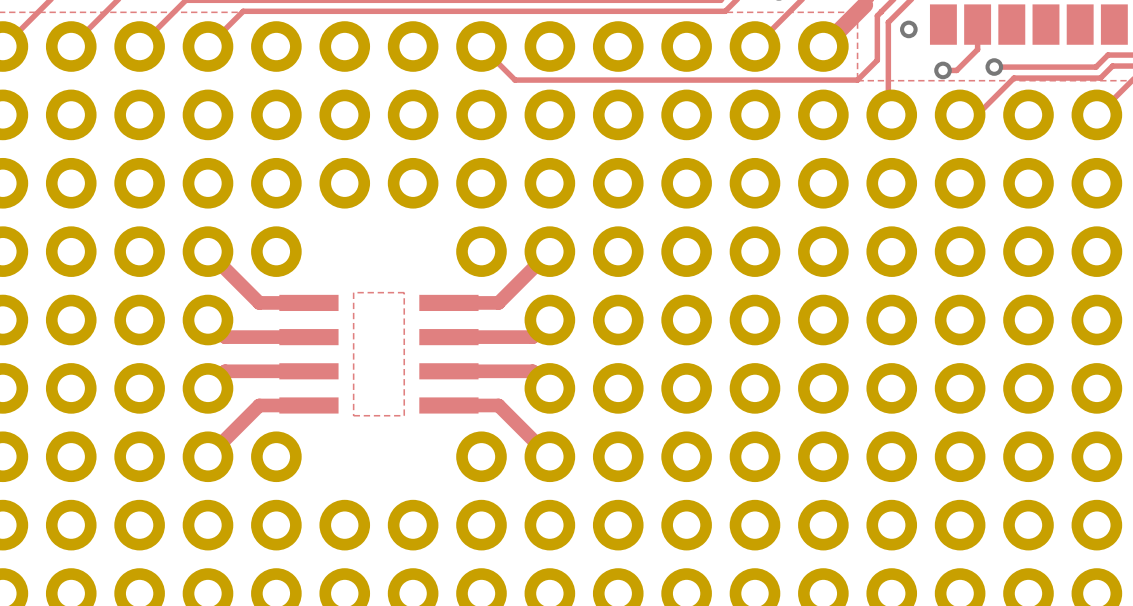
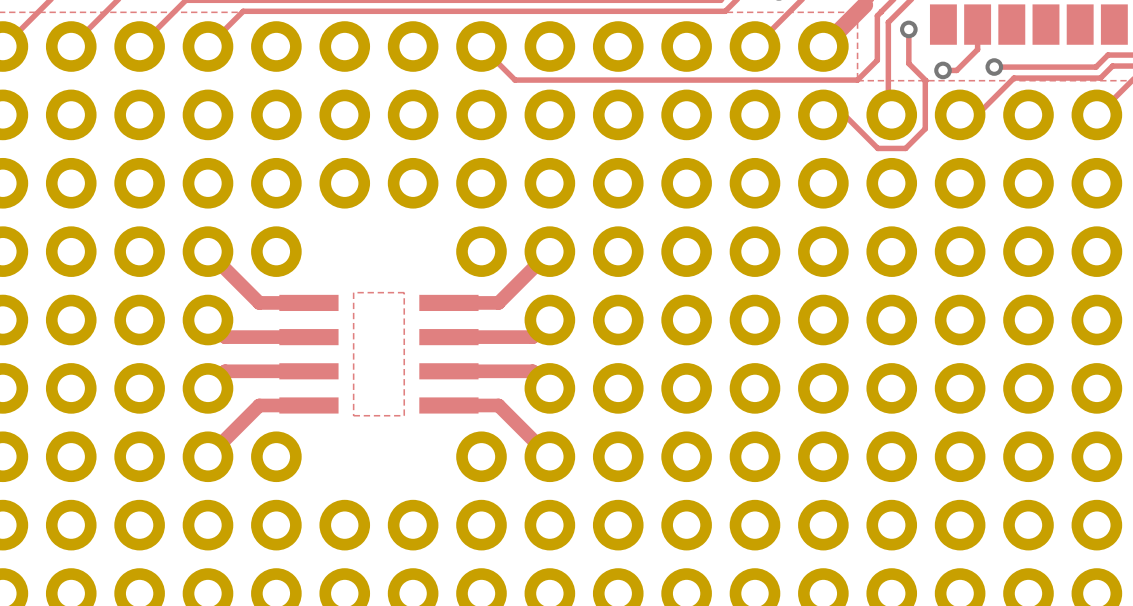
track: none -> (908, 29) (908, 63) (925, 80) (925, 128) (905, 148) (877, 148) (844, 114) (823, 114)

